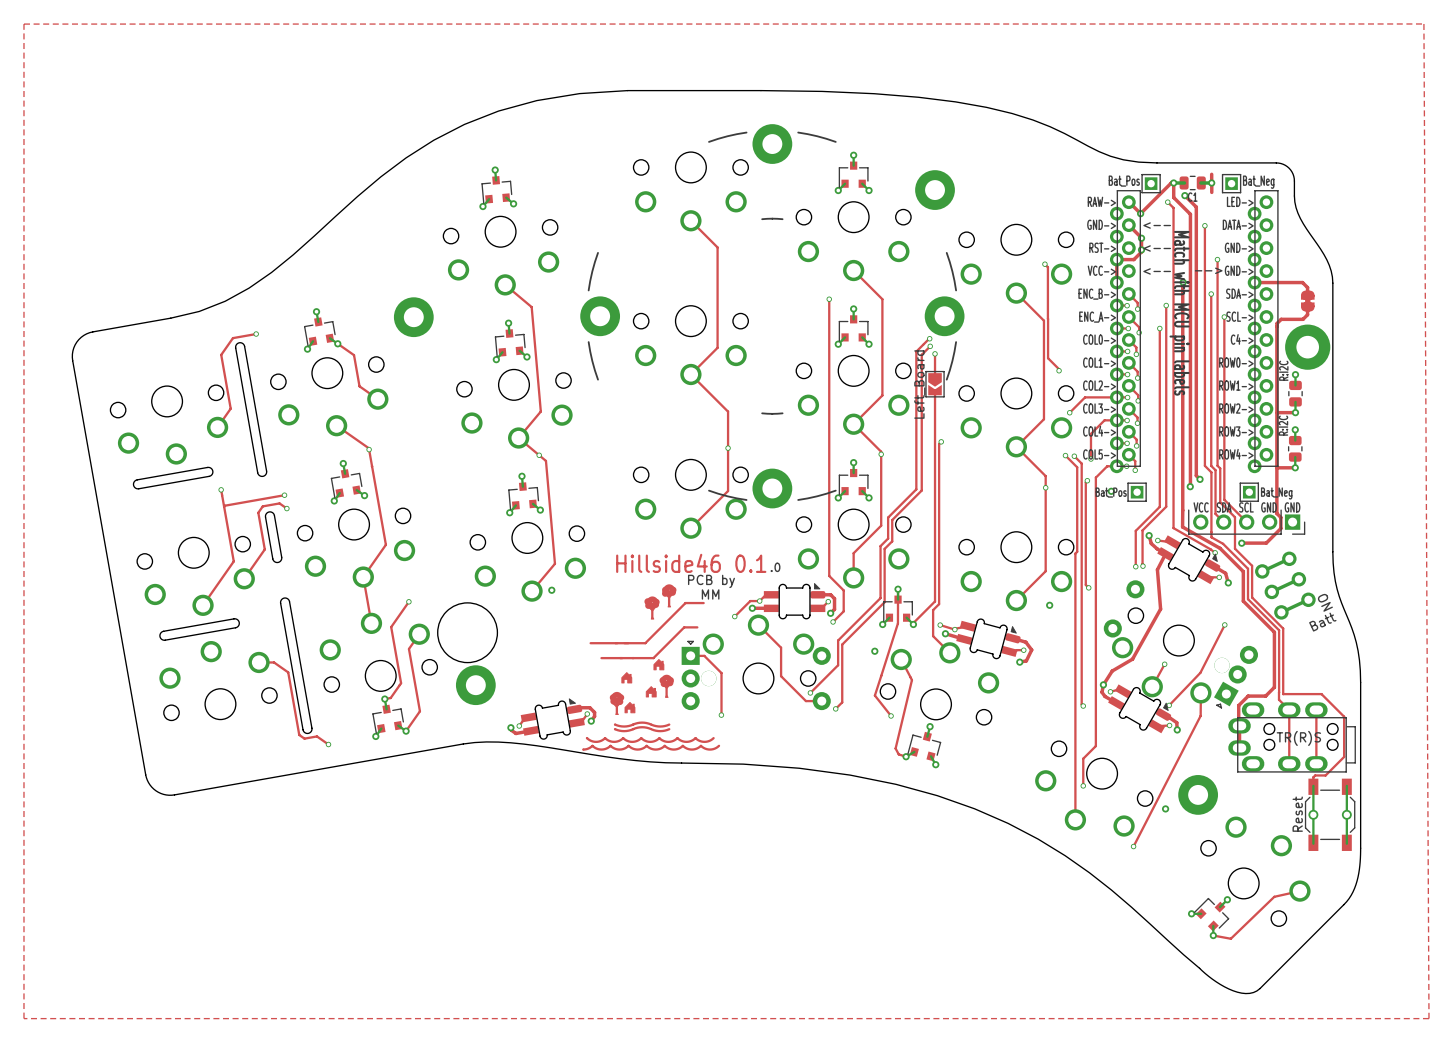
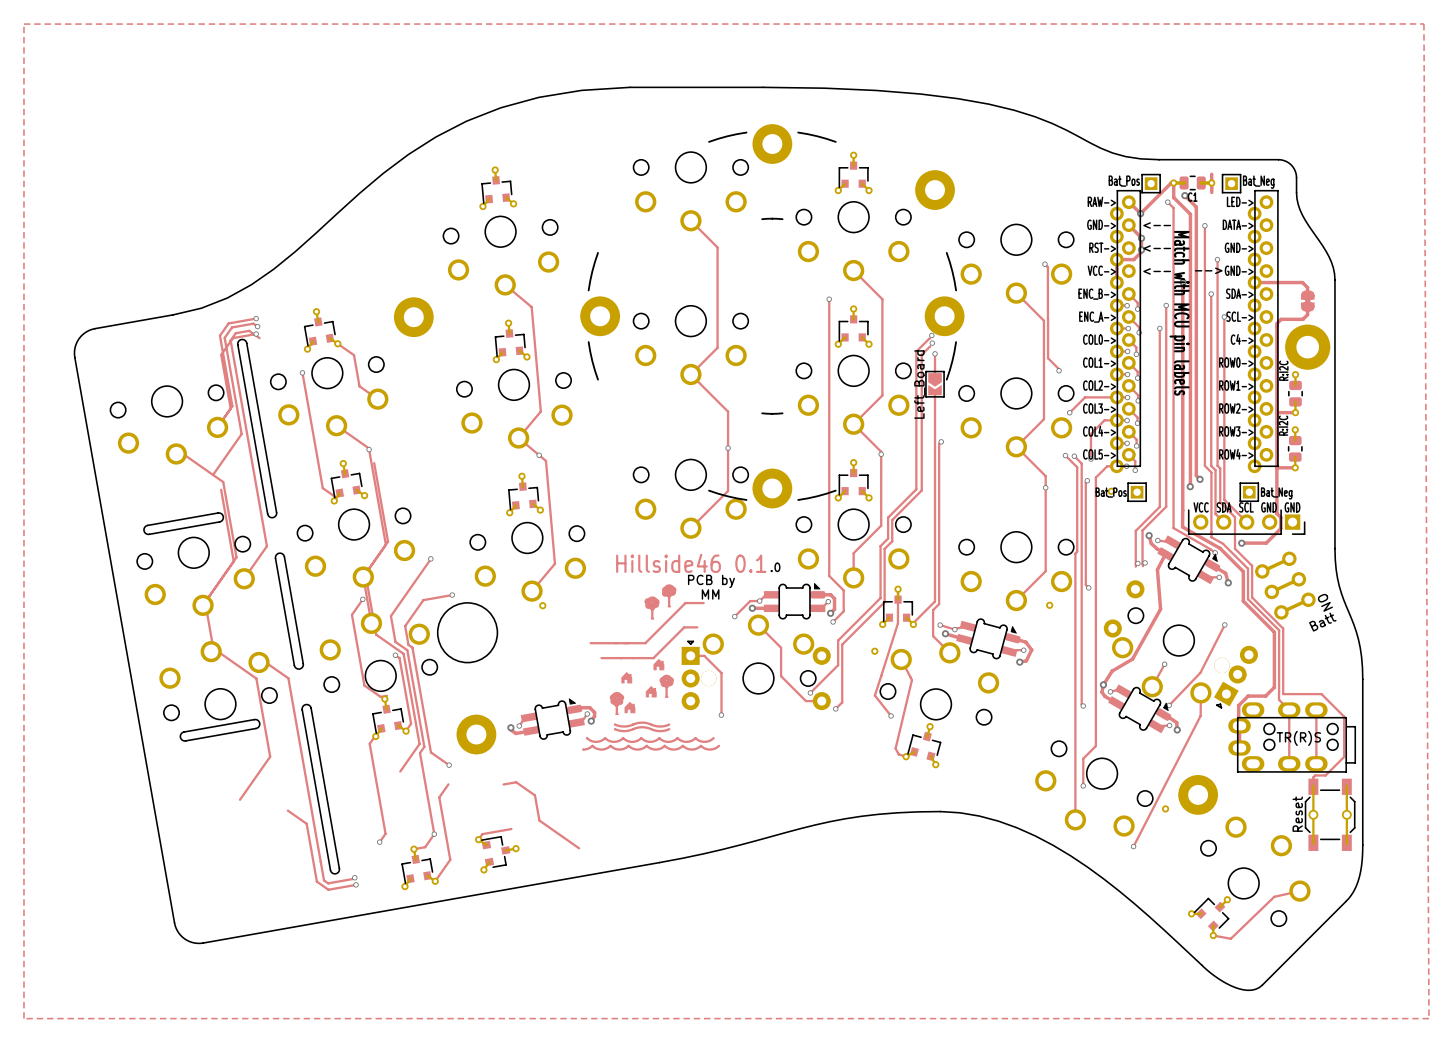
board edge: (627, 90) (822, 91) (918, 97) (955, 101) (1012, 113) (1050, 126) (1099, 151) (1123, 159) (1156, 162) (1276, 162) (1285, 165) (1290, 170) (1294, 178) (1294, 201) (1297, 213) (1326, 259) (1332, 276) (1333, 562) (1337, 589) (1354, 635) (1359, 660) (1360, 858) (1355, 884) (1346, 901) (1256, 990) (1241, 993) (1216, 981) (1111, 890) (1065, 855) (1038, 839) (974, 808) (937, 795) (896, 784) (850, 775) (799, 768) (743, 764) (635, 760) (523, 744) (486, 741) (463, 743) (174, 794) (160, 793) (149, 784) (145, 774) (72, 360) (72, 351) (76, 342) (89, 332) (199, 311) (225, 301) (249, 288) (293, 254) (380, 176) (433, 140) (464, 124) (498, 111) (536, 100) (579, 93) (627, 90) -> (629, 87) (581, 90) (538, 97) (500, 107) (466, 121) (435, 136) (383, 173) (295, 251) (251, 284) (227, 298) (201, 308) (91, 329) (83, 334) (77, 341) (74, 357) (174, 922) (178, 933) (189, 941) (203, 943) (682, 858) (845, 818) (897, 812) (940, 811) (960, 812) (998, 821) (1053, 845) (1087, 867) (1119, 891) (1218, 978) (1243, 989) (1259, 987) (1348, 898) (1358, 881) (1362, 855) (1361, 656) (1356, 631) (1339, 586) (1335, 559) (1334, 273) (1328, 256) (1300, 209) (1296, 198) (1296, 175) (1292, 166) (1285, 161) (1278, 159) (1159, 159) (1125, 156) (1101, 148) (1052, 123) (1014, 110) (957, 98) (920, 94) (824, 88) (629, 87)
track: none -> (256, 318) (228, 323) (219, 335) (232, 406) (219, 424)
via: none -> (256, 318)
track: none -> (257, 326) (253, 323) (232, 327) (224, 337) (241, 434) (213, 474)
via: none -> (257, 326)
via: none -> (931, 335)
track: none -> (259, 338) (249, 330) (235, 333) (230, 340) (266, 546) (246, 575)
via: (929, 338) -> none
via: none -> (932, 343)
board edge: (244, 346) (266, 471) (262, 476) (257, 472) (235, 348) (239, 342) (244, 346) -> (246, 343) (241, 339) (237, 344) (267, 513) (272, 517) (276, 512) (246, 343)
via: (930, 346) -> none
track: none -> (302, 372) (322, 488) (336, 497)
via: none -> (302, 372)
track: none -> (178, 450) (223, 482) (236, 557) (205, 602) (213, 648) (256, 678) (270, 756) (240, 799)
track: none -> (374, 463) (388, 541) (365, 573) (376, 634) (403, 653) (419, 744) (400, 771)
board edge: (207, 467) (137, 479) (133, 485) (138, 488) (209, 476) (212, 471) (207, 467) -> (218, 513) (147, 525) (144, 530) (149, 534) (219, 521) (223, 516) (218, 513)
via: (221, 489) -> none
track: (284, 495) (224, 506) -> none
via: (284, 495) -> none
track: (286, 508) (279, 503) (262, 506) (258, 512) (264, 549) (244, 578) -> none
via: (286, 508) -> none
board edge: (274, 515) (281, 557) (277, 562) (272, 559) (265, 516) (269, 511) (274, 515) -> none
board edge: none -> (284, 556) (303, 663) (299, 668) (294, 665) (275, 558) (279, 553) (284, 556)
via: none -> (430, 558)
track: none -> (430, 559) (390, 616) (395, 641) (407, 650) (424, 746) (420, 753) (434, 834) (425, 847) (413, 849)
via: none -> (1145, 562)
via: none -> (1137, 563)
via: (1135, 566) -> none
via: (1142, 566) -> none
part position: (551, 590) -> (542, 605)
track: none -> (452, 595) (423, 600) (405, 626) (408, 644) (412, 647) (430, 752) (449, 765)
via: none -> (452, 595)
track: none -> (362, 599) (351, 614) (364, 685) (380, 696) (386, 695)
via: none -> (362, 599)
board edge: (289, 601) (311, 728) (308, 733) (303, 729) (280, 603) (284, 598) (289, 601) -> none
track: (408, 601) (391, 627) (401, 683) (390, 698) (384, 699) -> none
via: (408, 601) -> none
board edge: (233, 618) (163, 631) (160, 637) (165, 640) (236, 627) (239, 621) (233, 618) -> none
track: (419, 634) (408, 648) (419, 711) (406, 731) -> none
track: none -> (395, 655) (399, 658) (411, 723) (408, 727)
via: none -> (395, 655)
track: none -> (261, 659) (288, 678) (324, 880) (328, 883) (354, 877)
track: (259, 662) (274, 662) (288, 672) (299, 734) (304, 738) (316, 736) (328, 744) -> none
part position: (475, 685) -> (476, 734)
board edge: none -> (311, 708) (339, 868) (335, 873) (330, 870) (302, 709) (305, 704) (311, 708)
board edge: none -> (254, 719) (183, 732) (180, 737) (185, 740) (256, 728) (259, 722) (254, 719)
track: none -> (377, 733) (369, 743) (385, 833) (379, 842)
via: (328, 744) -> none
via: none -> (449, 765)
track: none -> (448, 784) (439, 797) (450, 859) (435, 881)
track: none -> (503, 784) (516, 782) (534, 795) (539, 820) (579, 848)
track: none -> (287, 810) (306, 823) (316, 881) (328, 889) (356, 884)
track: none -> (511, 829) (482, 834) (478, 839)
via: none -> (434, 834)
via: none -> (379, 842)
part: none -> (497, 854)
part: none -> (420, 867)
via: none -> (354, 877)
via: none -> (356, 884)

